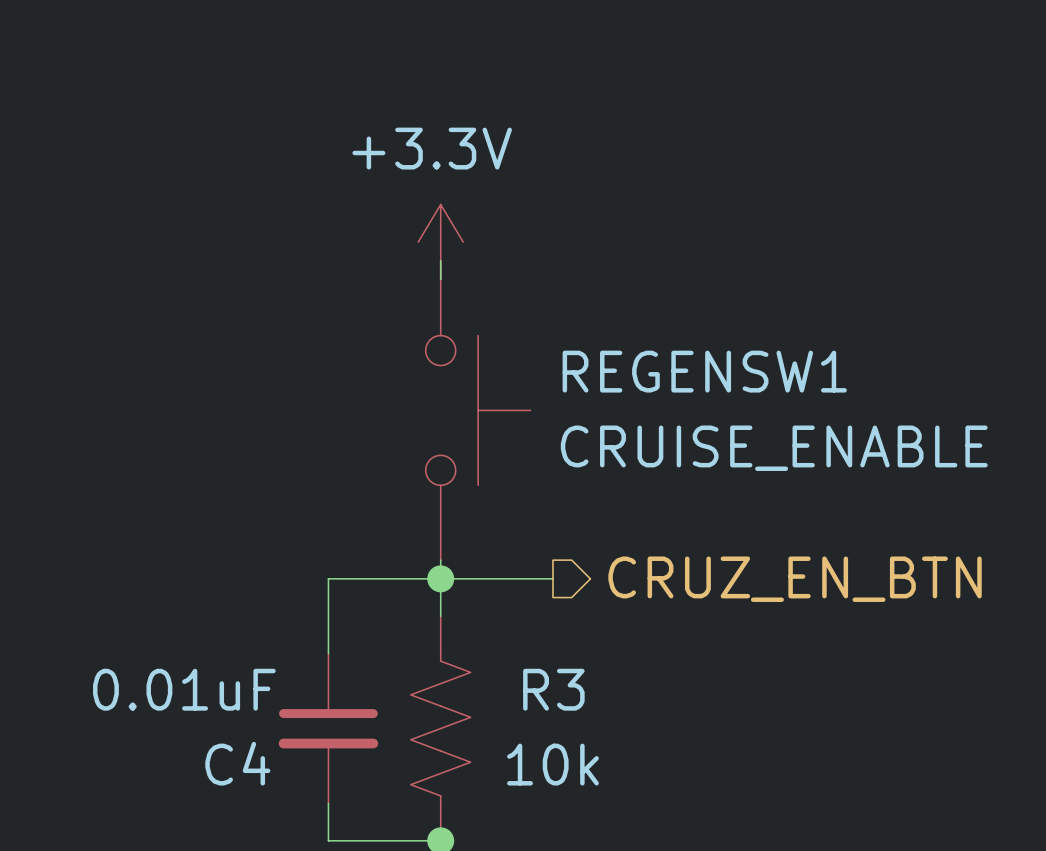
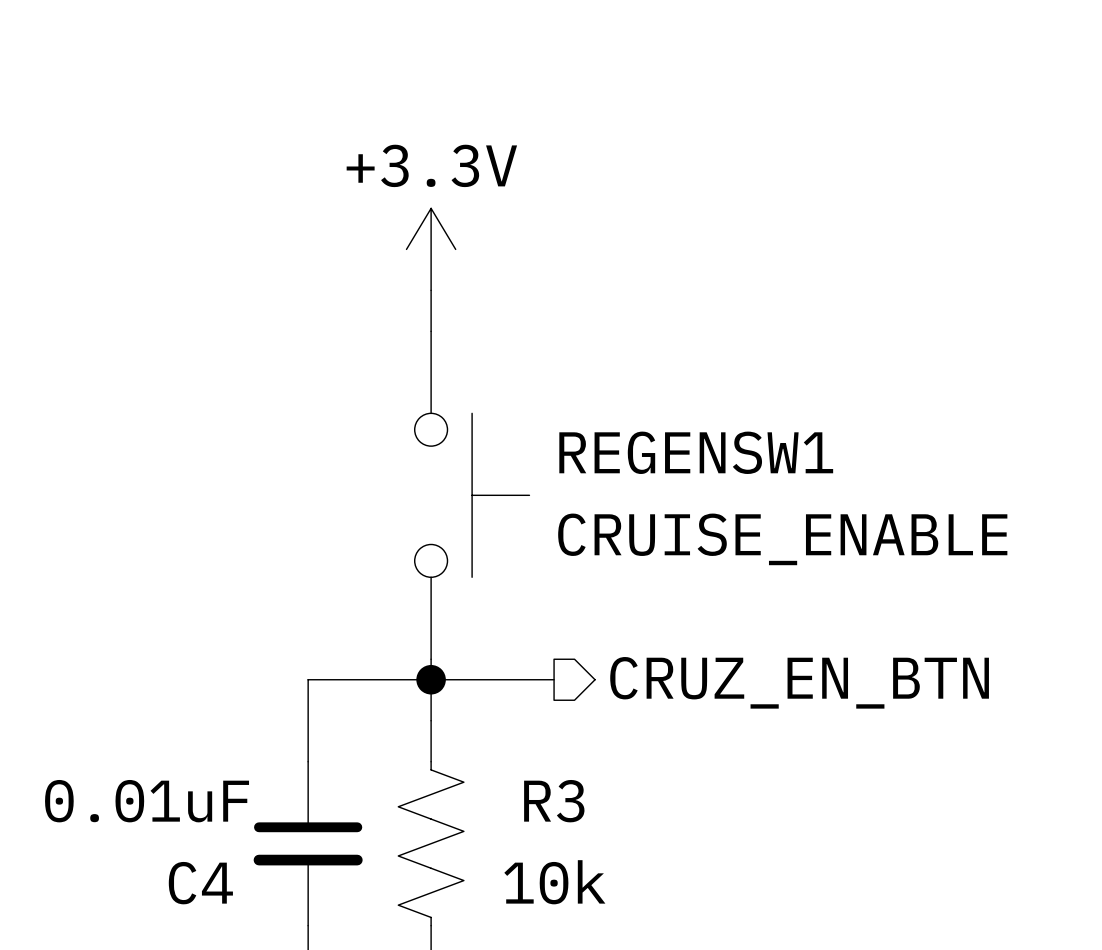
power symbol text position: +3.3V (432, 148) -> +3.3V (431, 165)
power symbol position: +3.3V (440, 242) -> +3.3V (431, 249)

